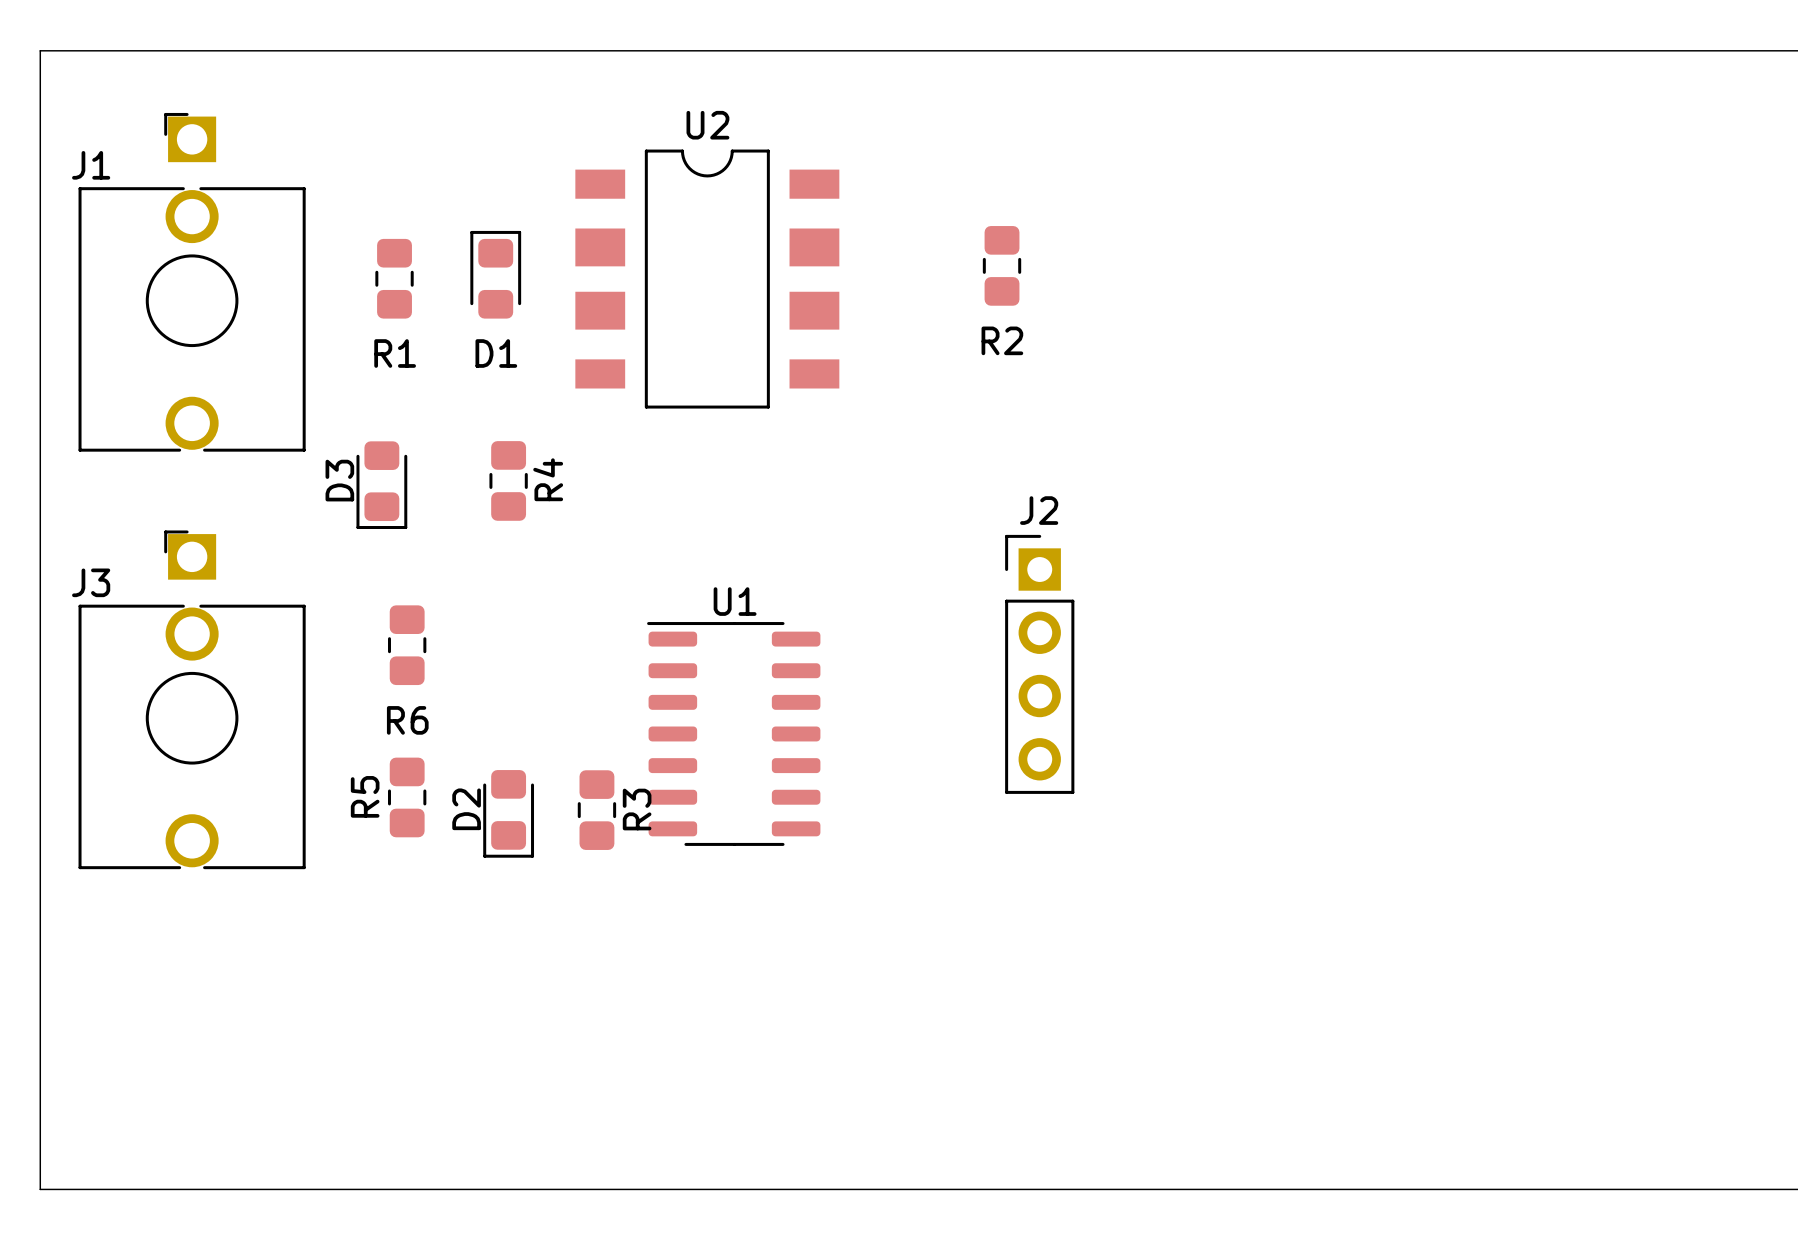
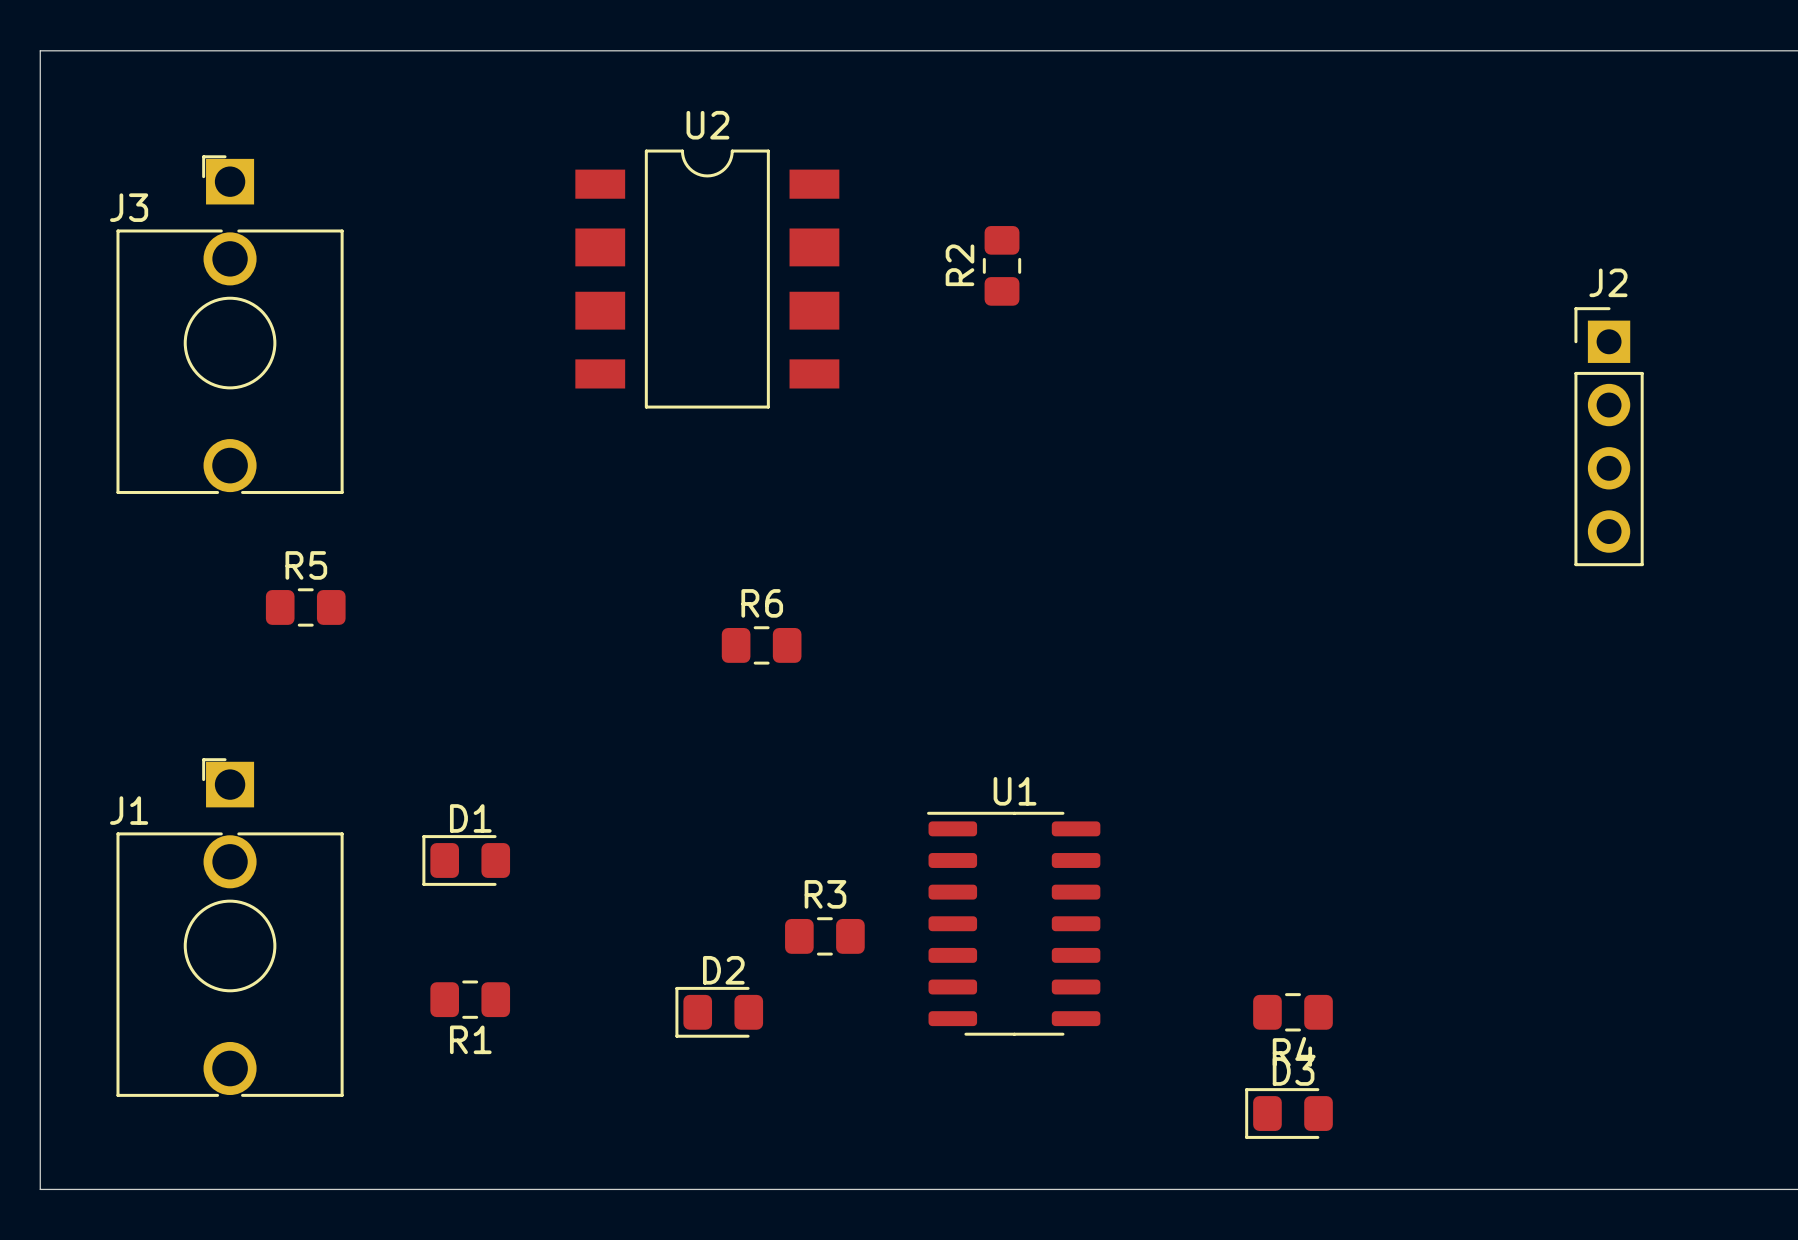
D1 rotation: 0° (495, 274) -> 90° counterclockwise (466, 860)
D1 position: (495, 274) -> (466, 860)
R1 rotation: 0° (394, 278) -> 90° clockwise (470, 999)
R1 position: (394, 278) -> (470, 999)
J1 position: (192, 282) -> (230, 927)
R2 name rotation: 0° (1002, 340) -> 90° counterclockwise (959, 265)
R2 name position: R2 (1002, 340) -> R2 (959, 265)
D1 name position: D1 (496, 353) -> D1 (470, 818)
R4 rotation: 0° (508, 480) -> 90° clockwise (1292, 1012)
R4 position: (508, 480) -> (1292, 1012)
D3 rotation: 0° (381, 485) -> 90° clockwise (1289, 1113)
D3 position: (381, 485) -> (1289, 1113)
R6 rotation: 0° (407, 645) -> 90° clockwise (761, 645)
R6 position: (407, 645) -> (761, 645)
J2 position: (1039, 664) -> (1609, 436)
J3 position: (192, 699) -> (230, 324)
R6 name position: R6 (407, 720) -> R6 (762, 603)
U1 position: (733, 733) -> (1013, 923)
R5 rotation: 0° (407, 797) -> 90° clockwise (305, 607)
R5 position: (407, 797) -> (305, 607)
R3 name position: R3 (637, 809) -> R3 (825, 894)
R3 rotation: 0° (596, 810) -> 90° clockwise (824, 936)
R3 position: (596, 810) -> (824, 936)
D2 rotation: 0° (508, 813) -> 90° clockwise (719, 1012)
D2 position: (508, 813) -> (719, 1012)

